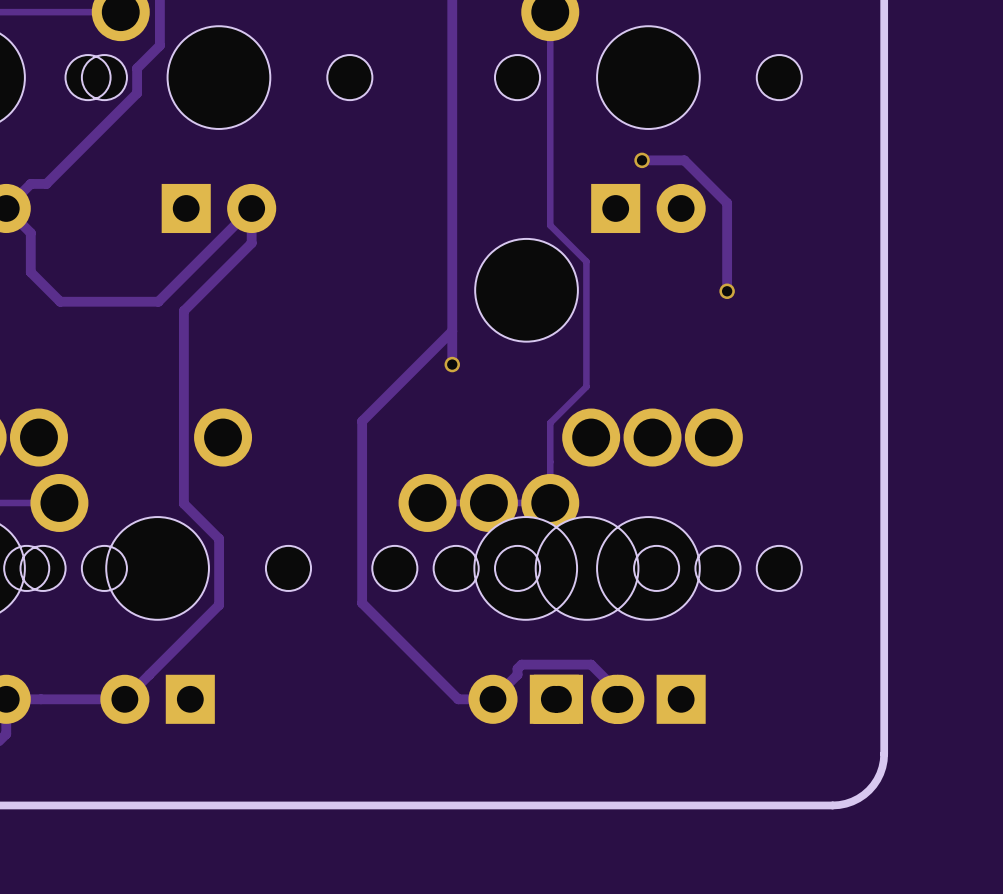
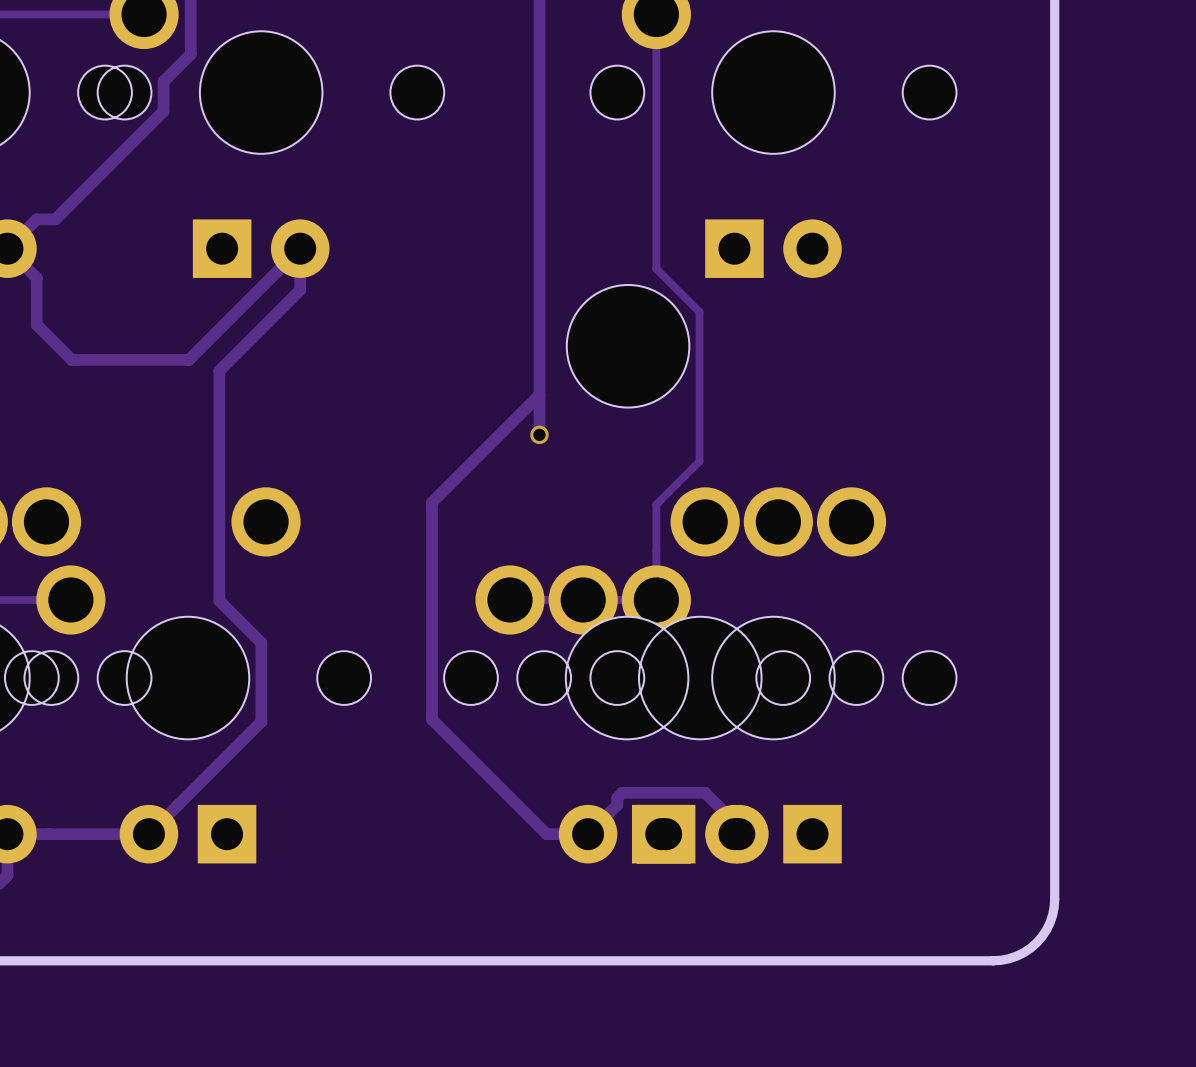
track: (642, 160) (684, 160) (727, 203) (727, 291) -> none
via: (642, 160) -> none
via: (727, 291) -> none

